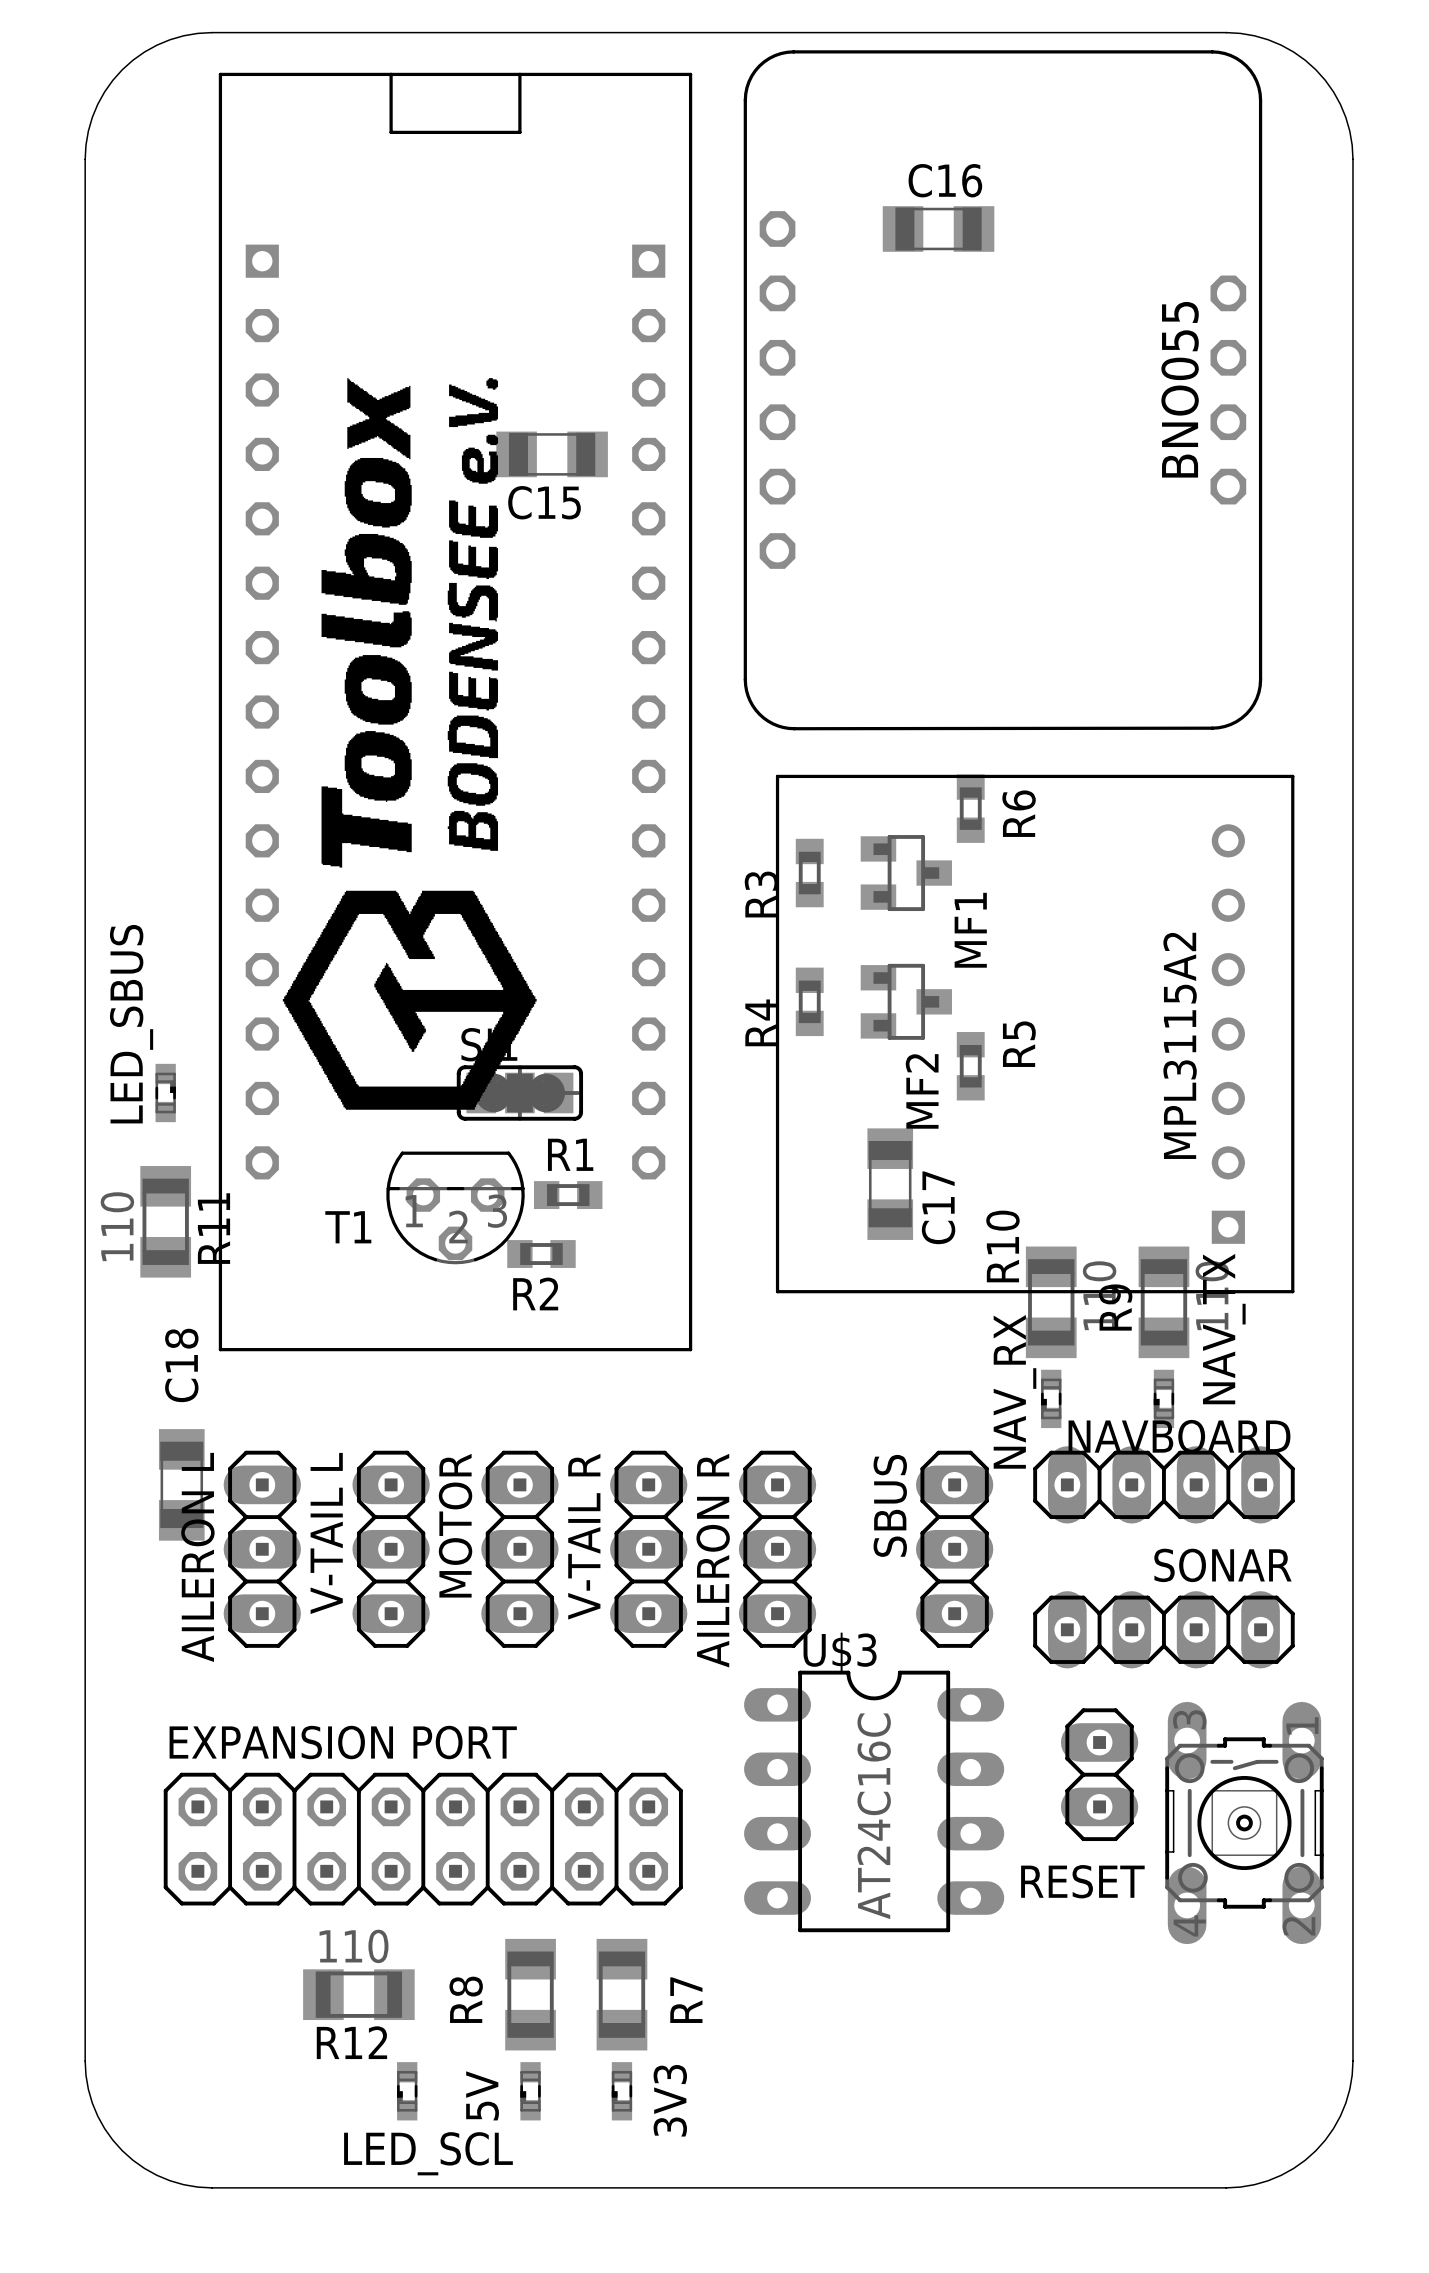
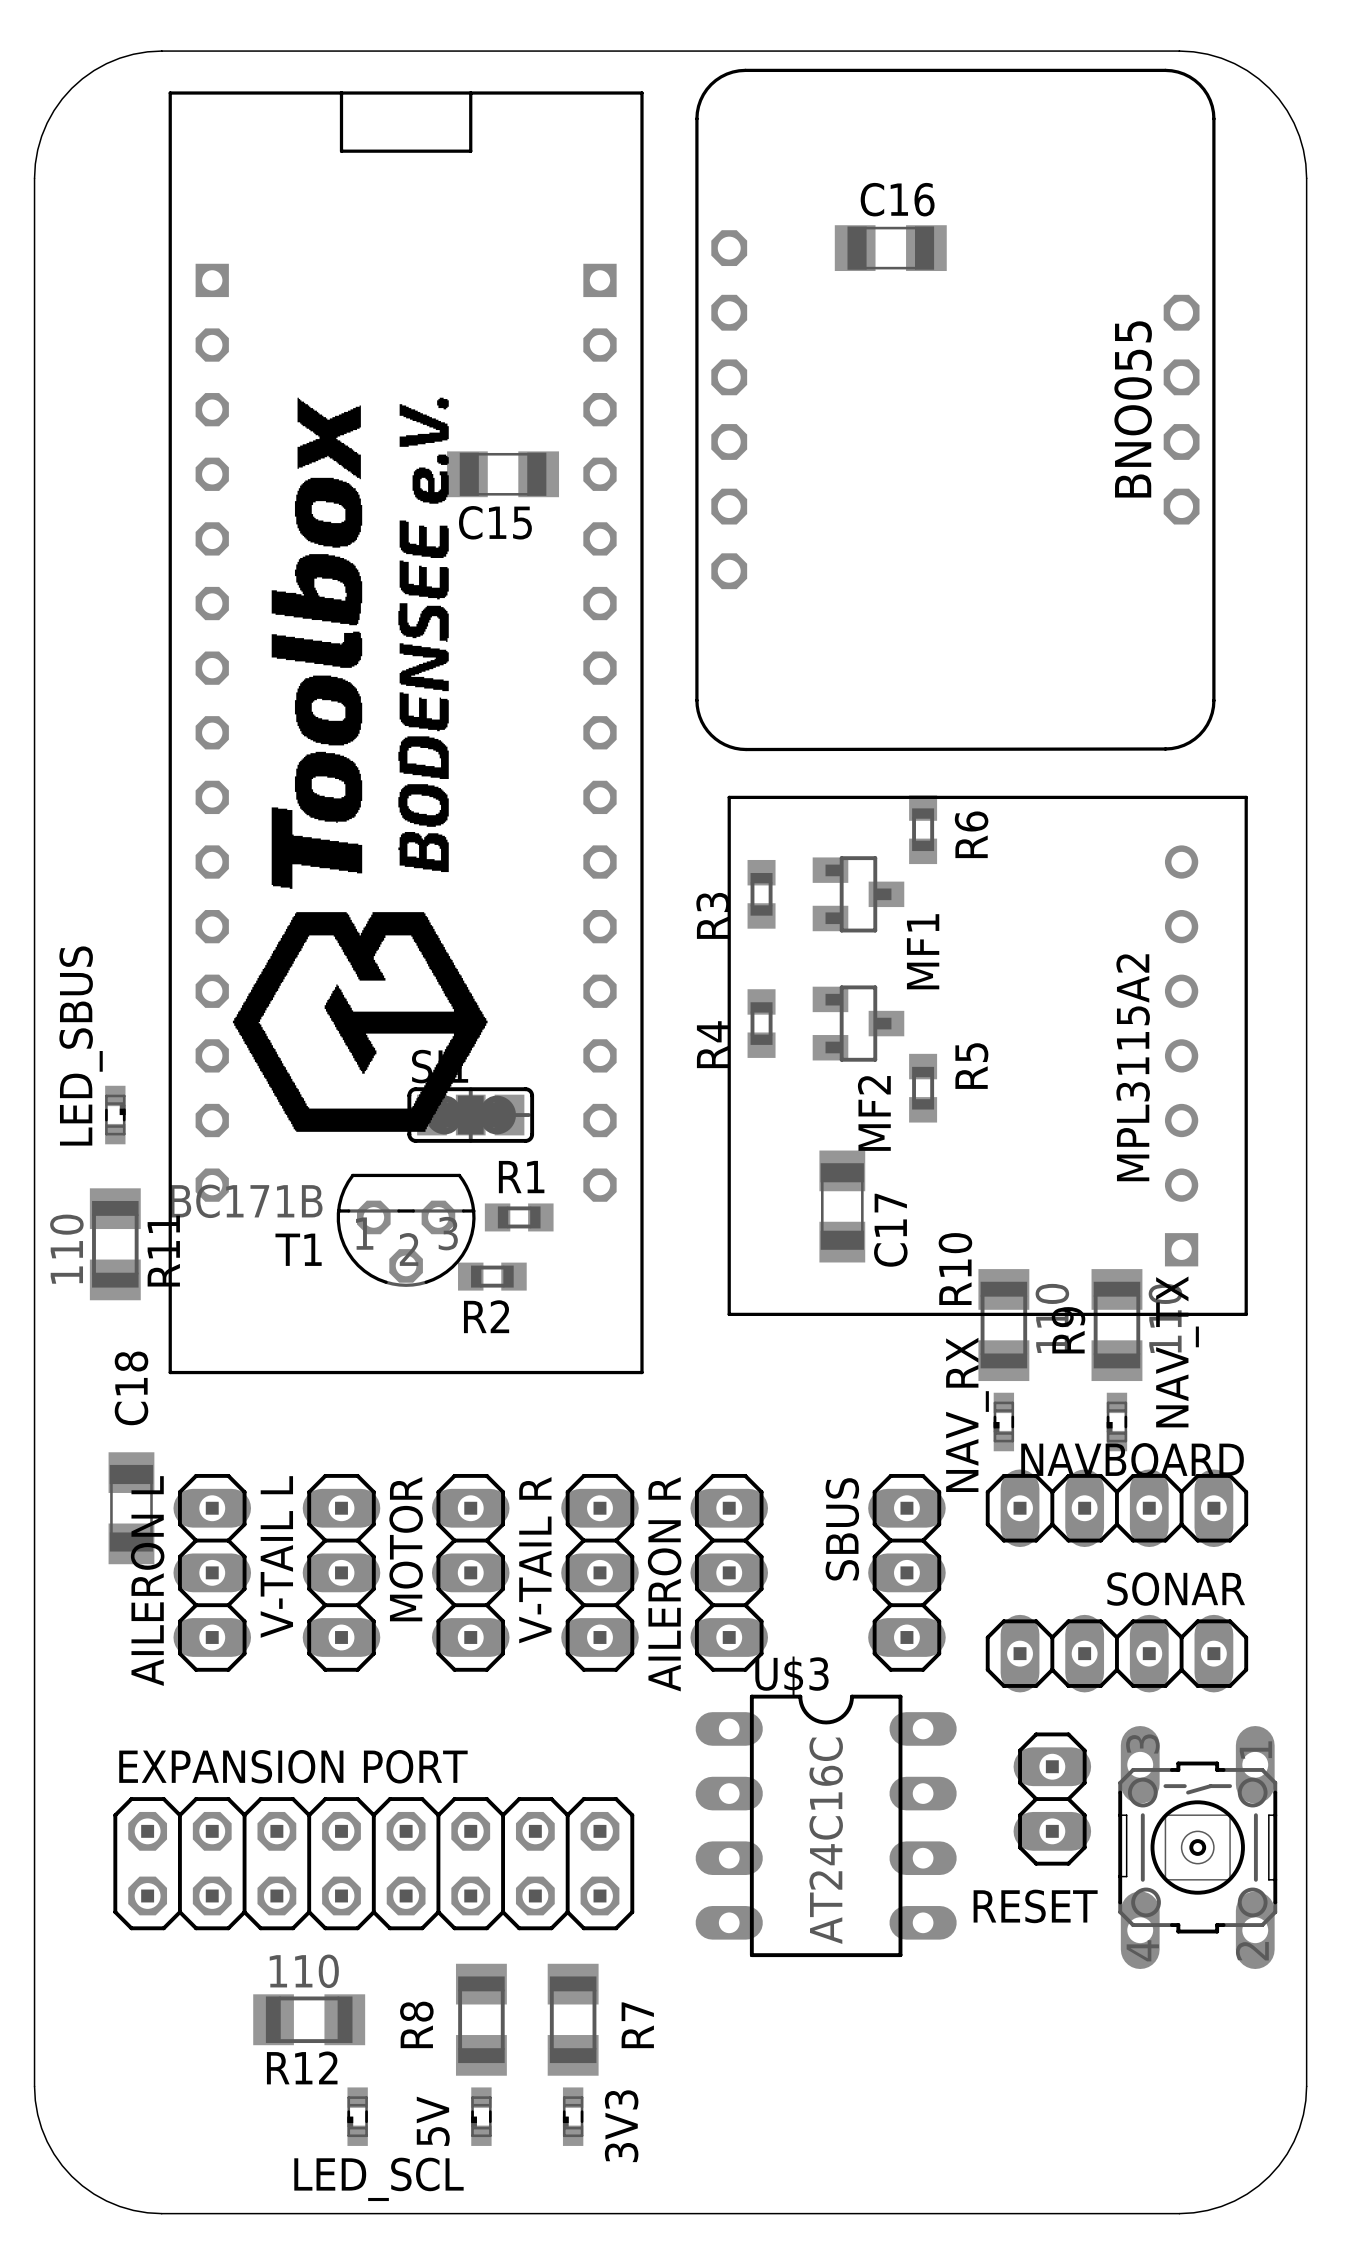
T1 value: none -> BC171B (246, 1201)

